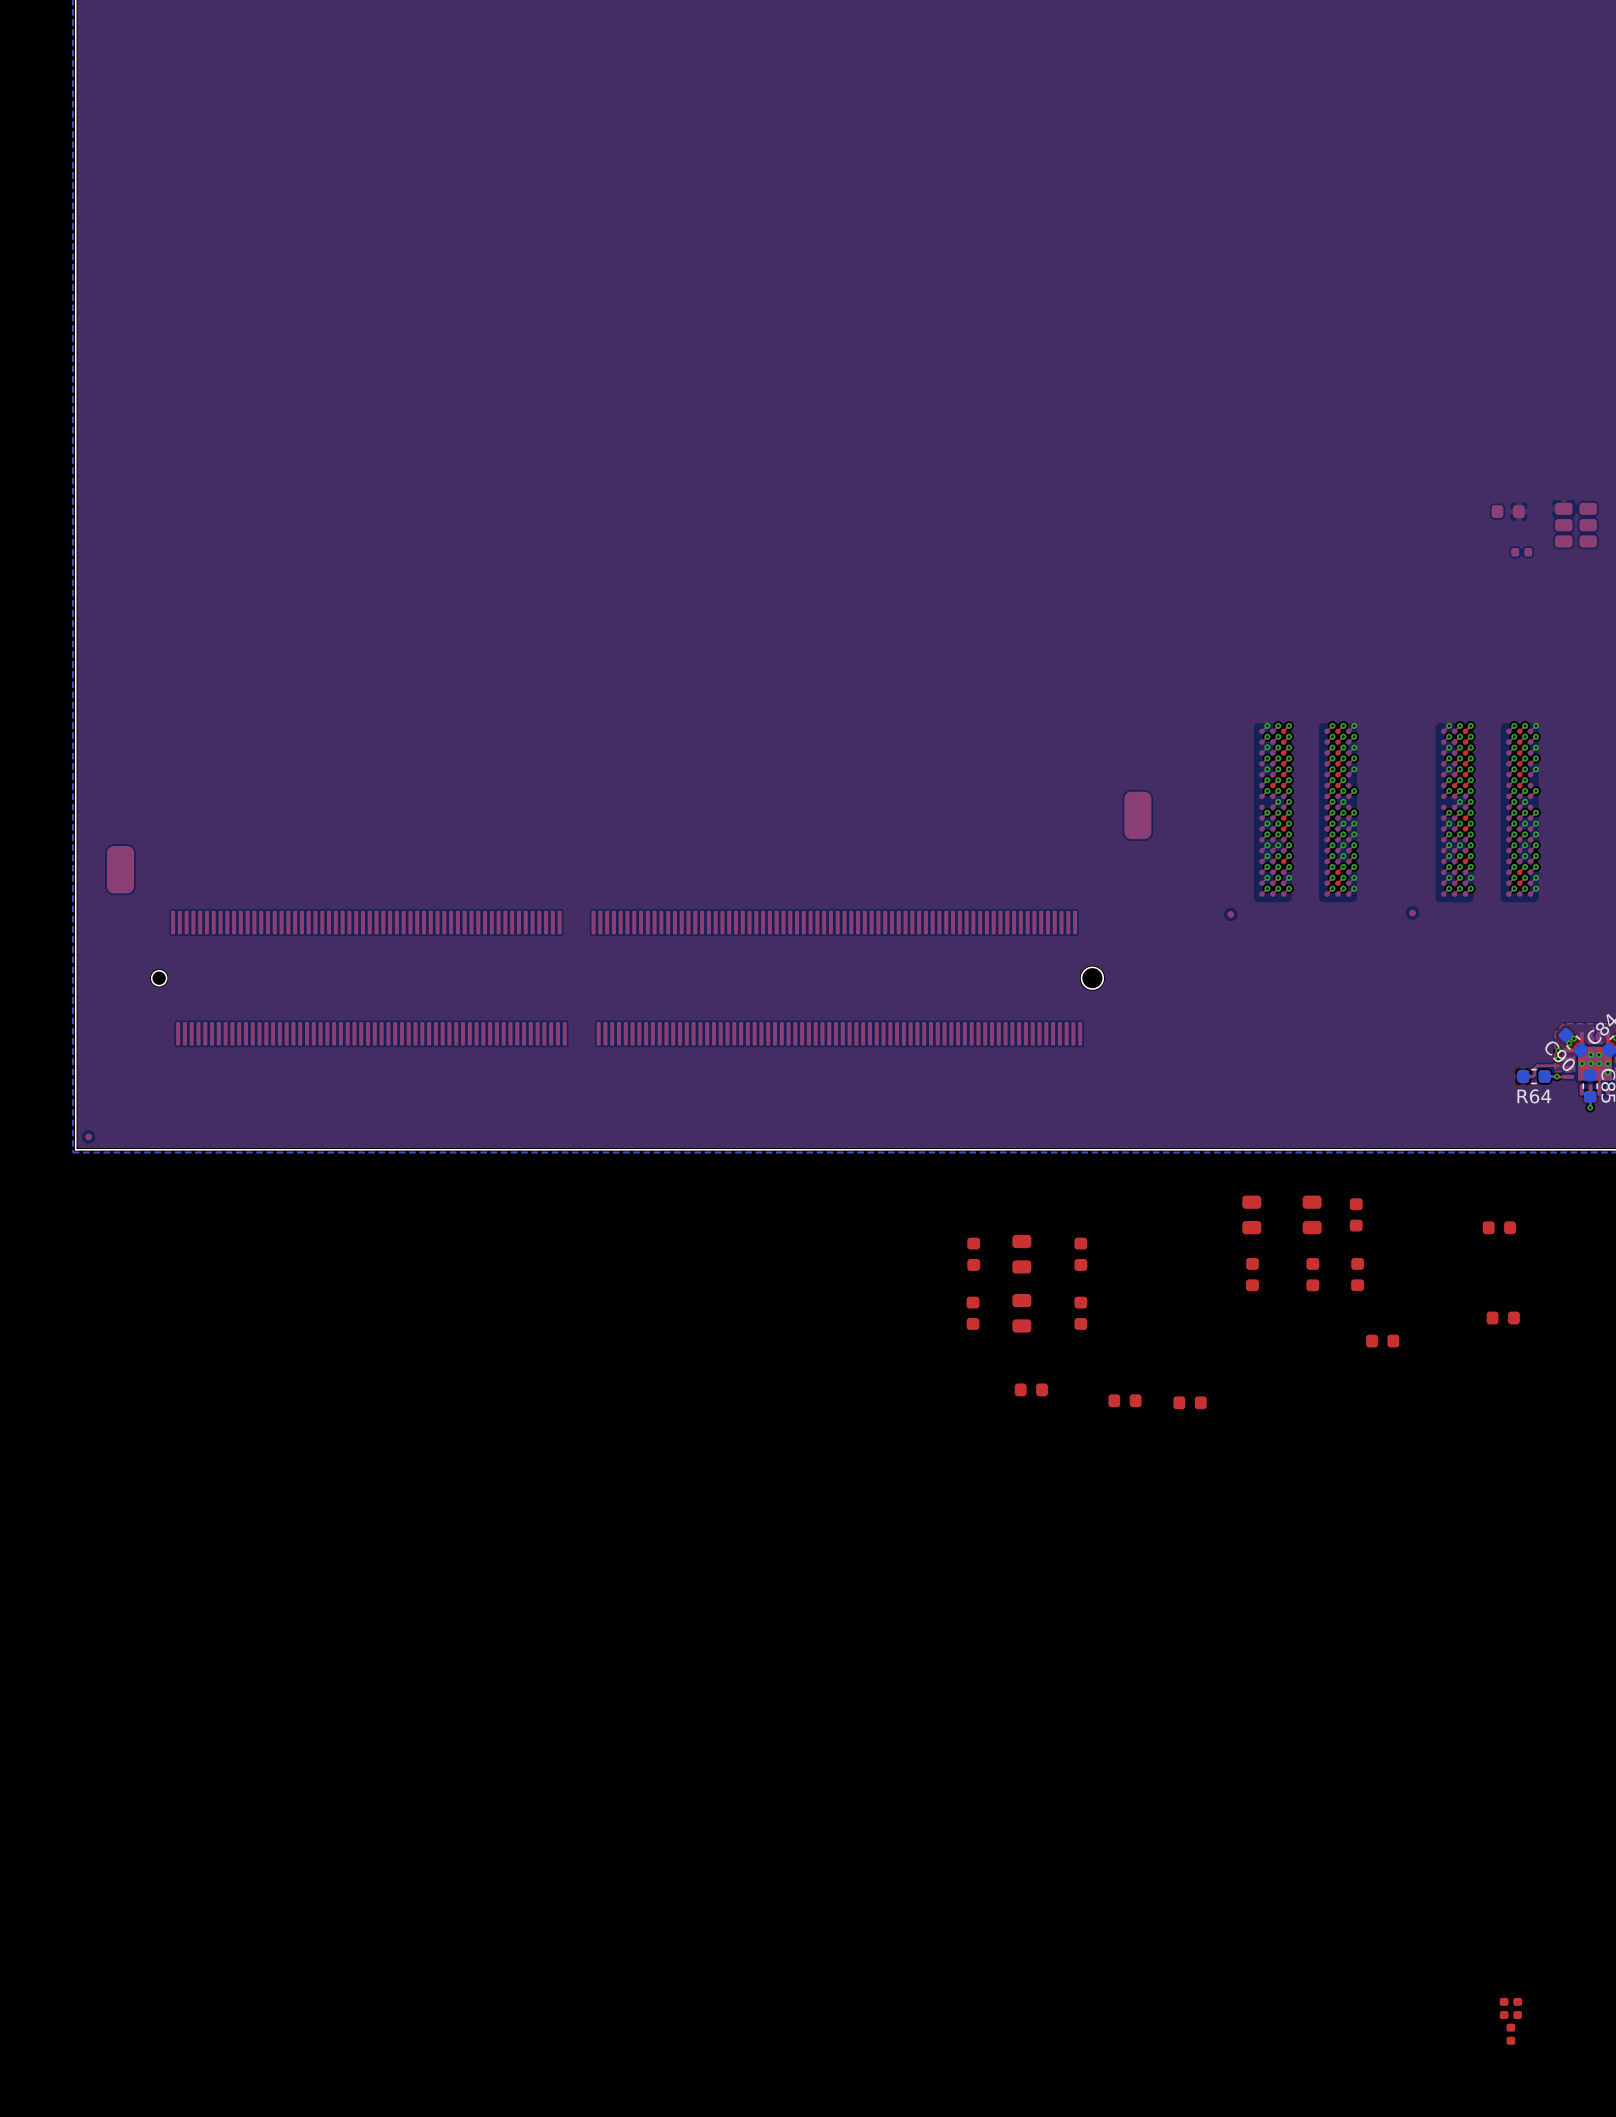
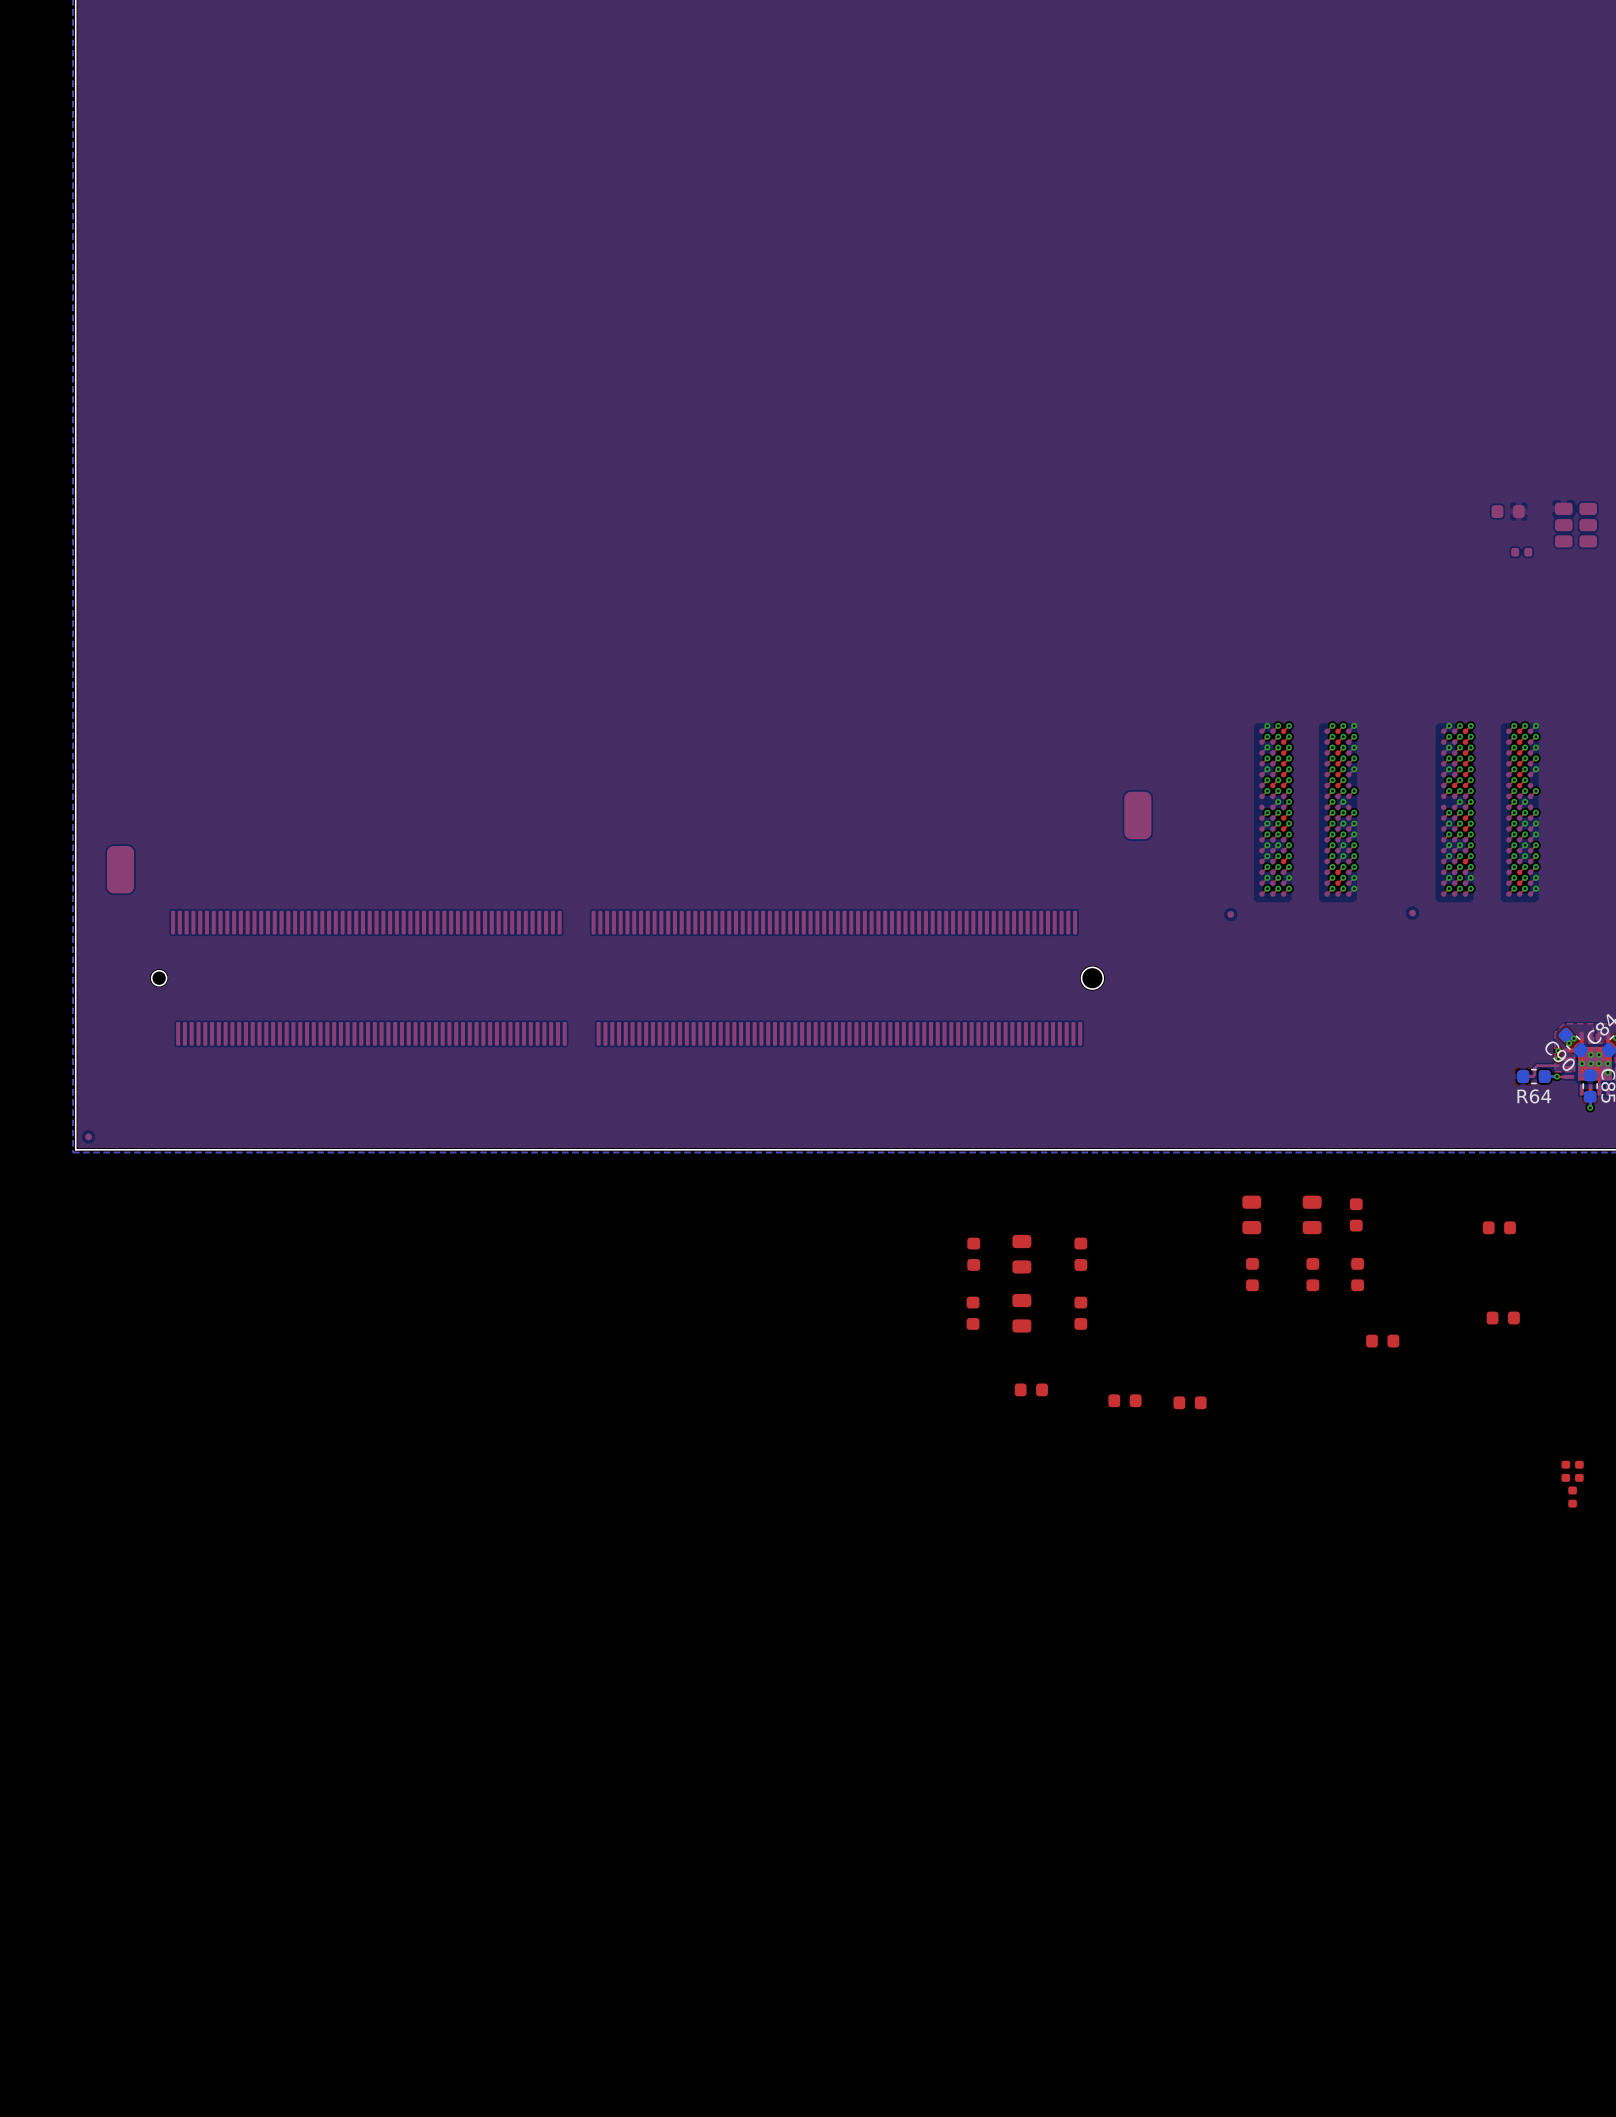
part: none -> (1565, 1471)
part: none -> (1579, 1471)
part: none -> (1572, 1497)
part: (1504, 2008) -> none
part: (1517, 2008) -> none
part: (1510, 2034) -> none

